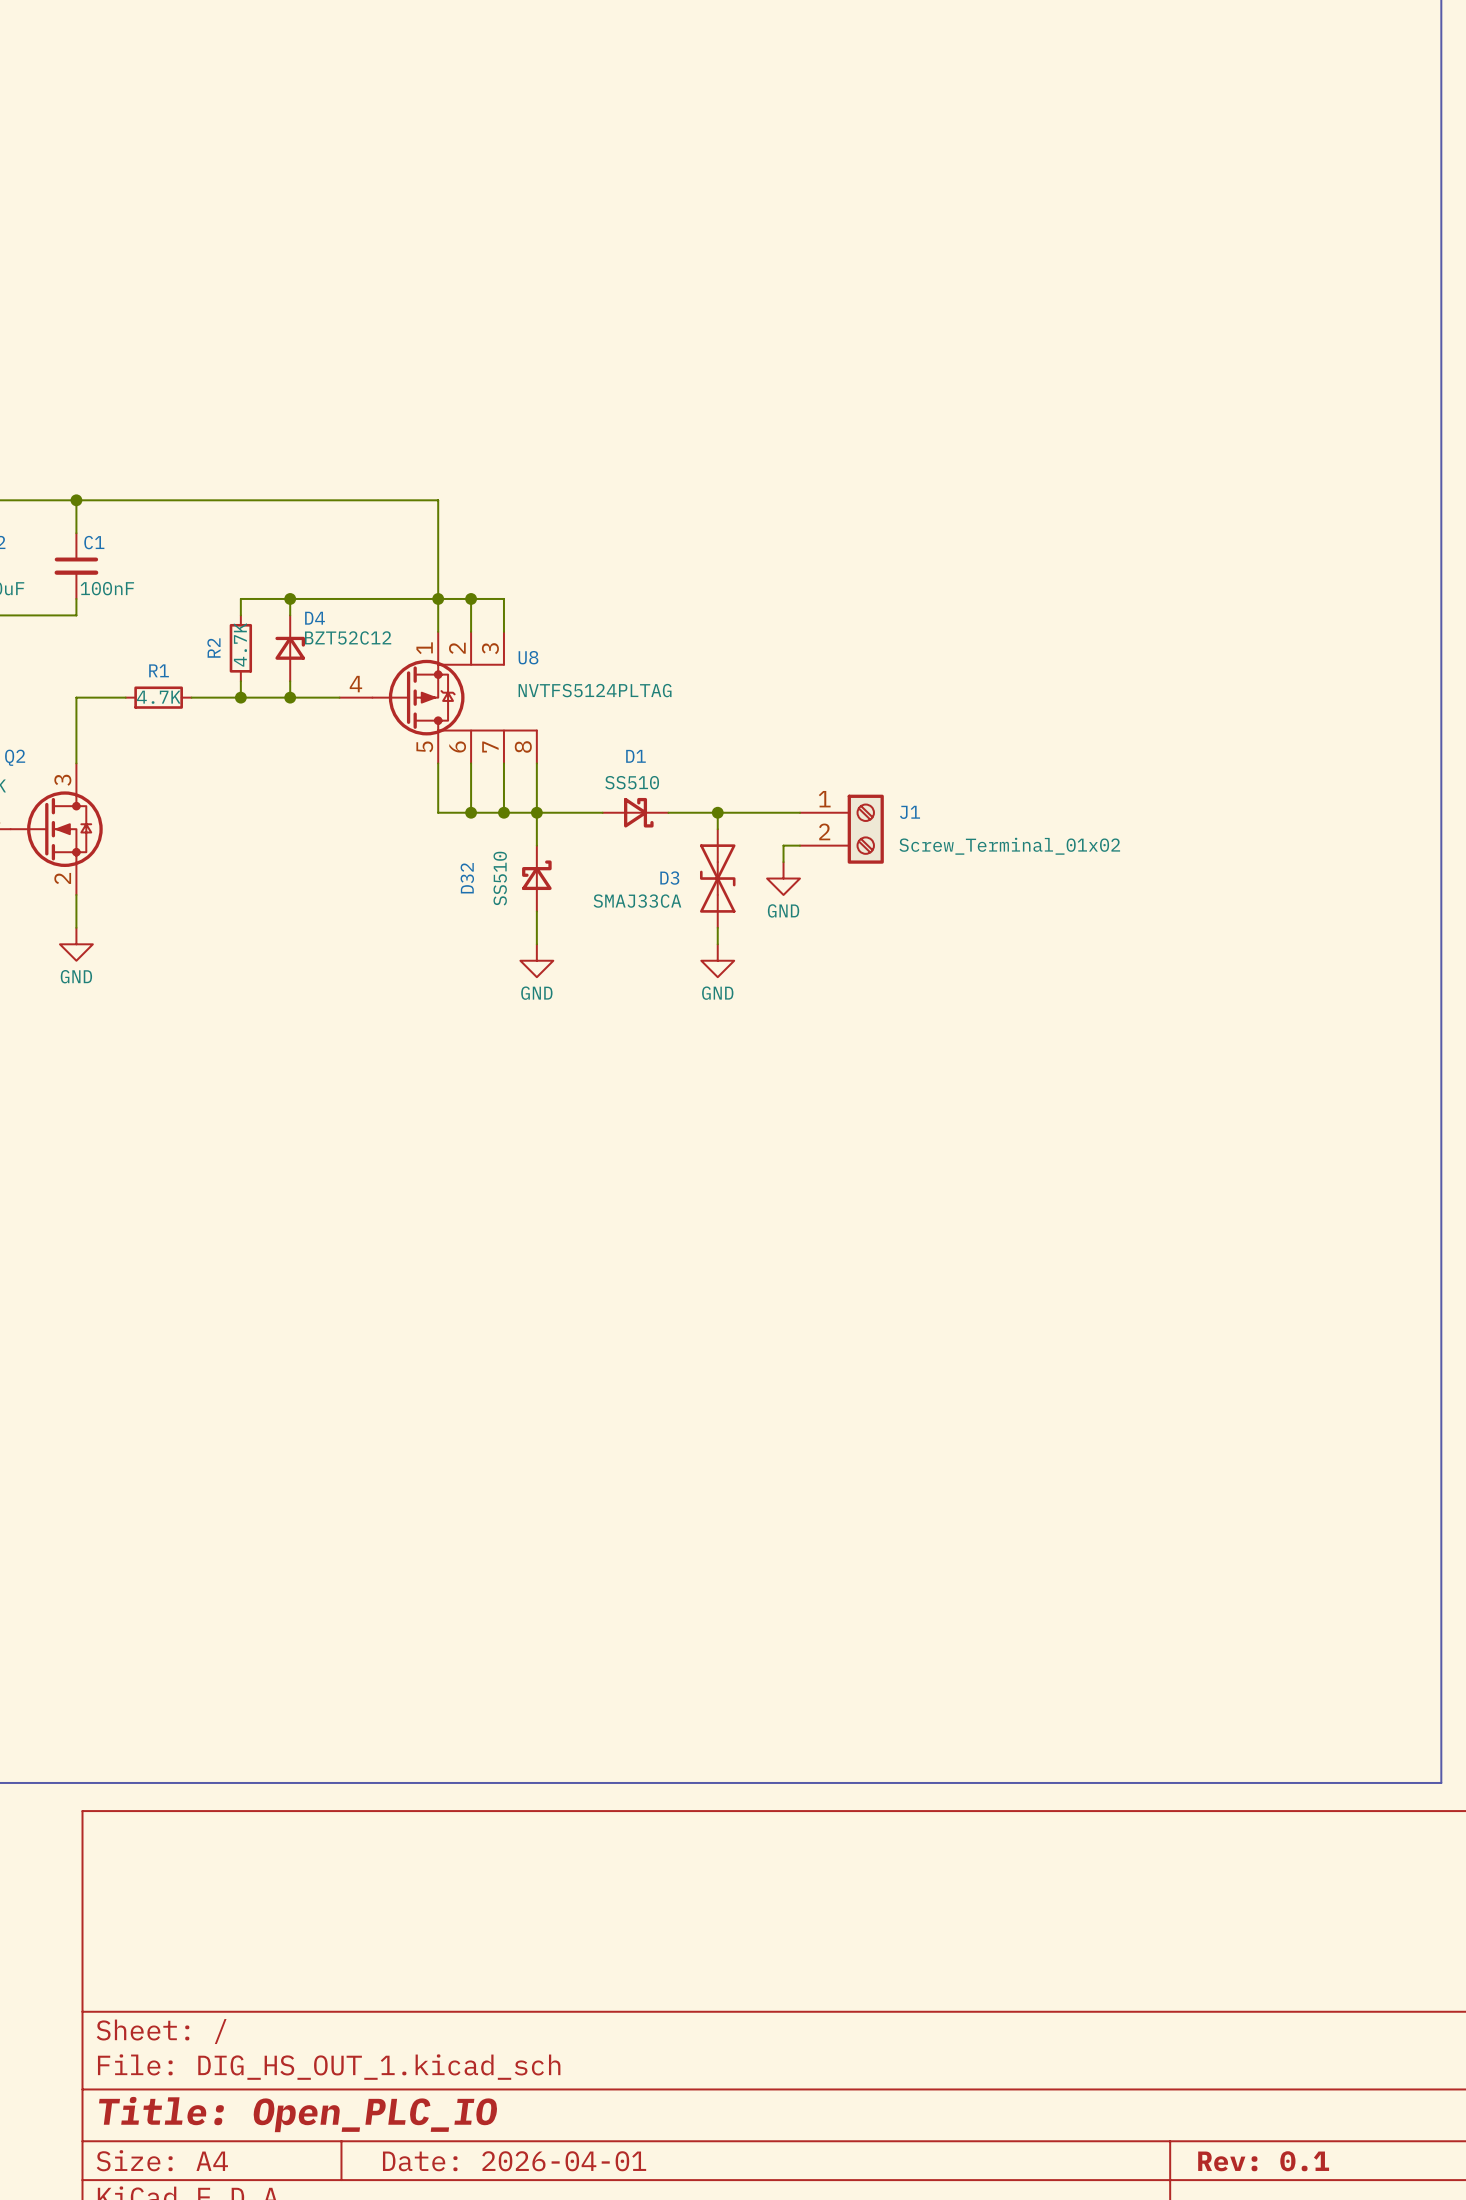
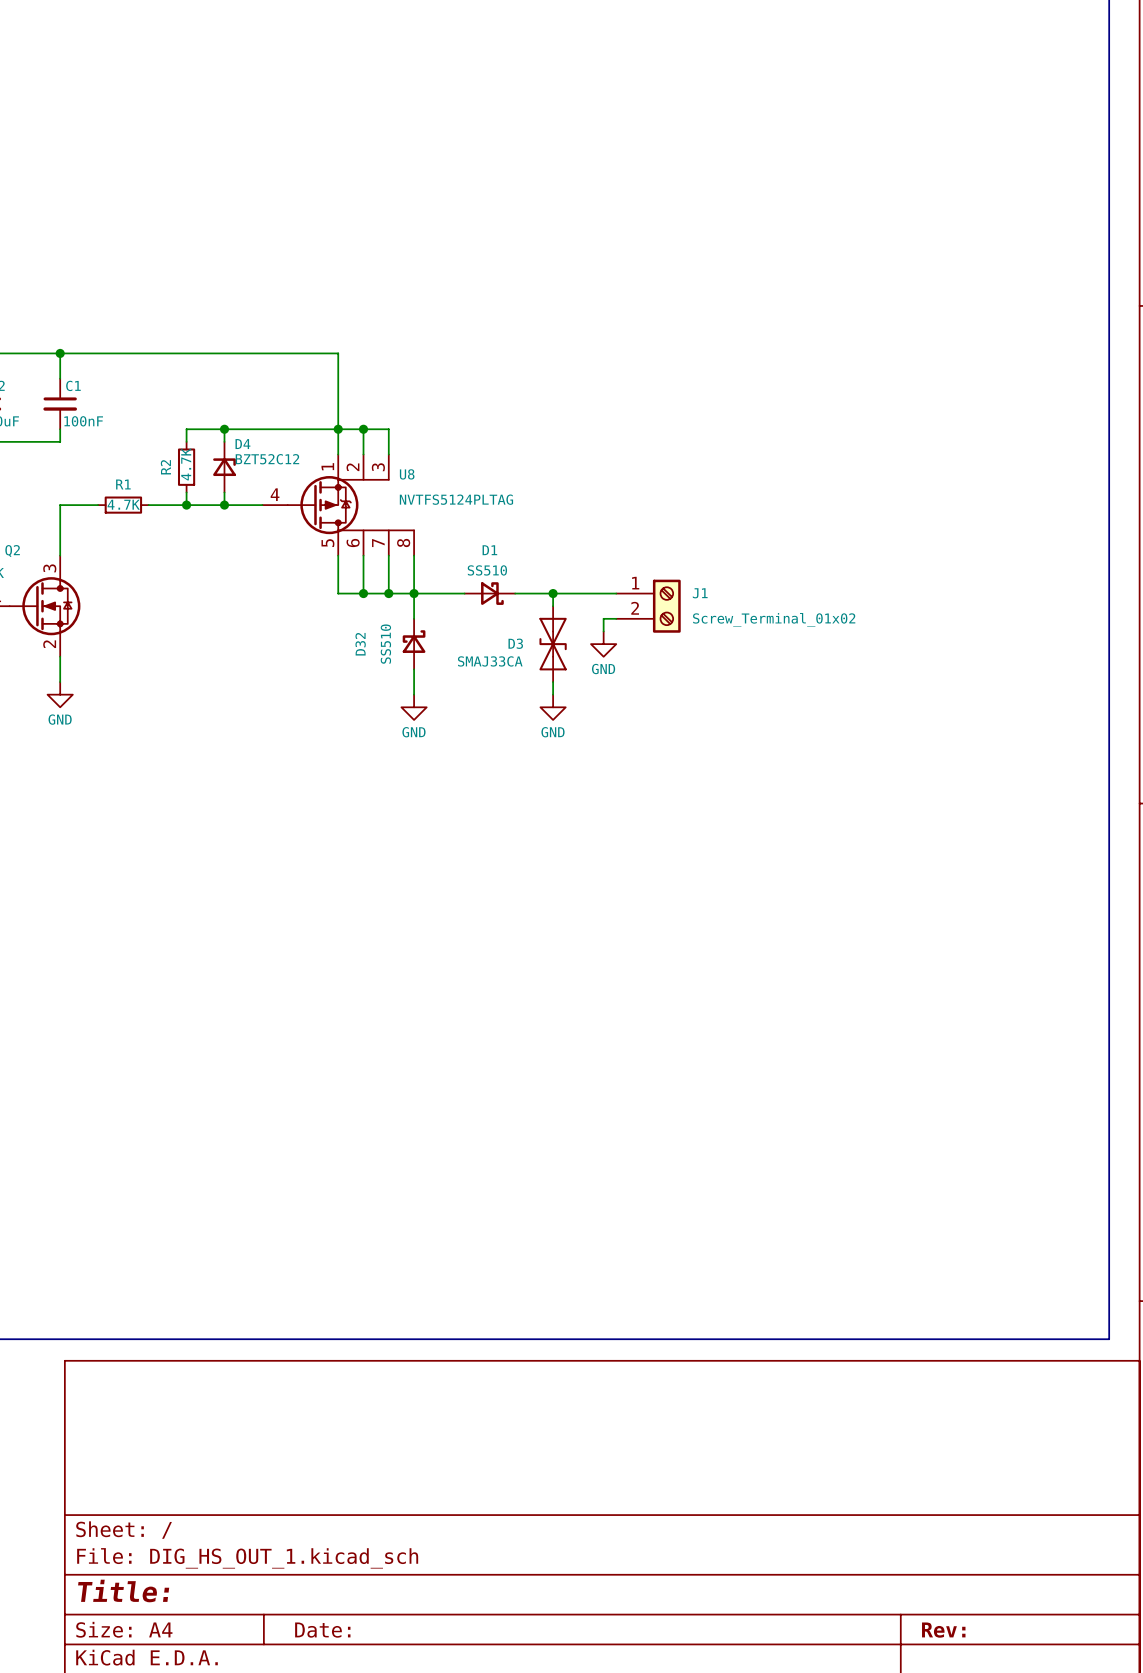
title block: Title: Open_PLC_IO (298, 2114) -> Title: (123, 1590)
title block: Date: 2026-04-01 (514, 2161) -> Date: (322, 1630)
title block: Rev: 0.1 (1263, 2161) -> Rev: (943, 1630)

